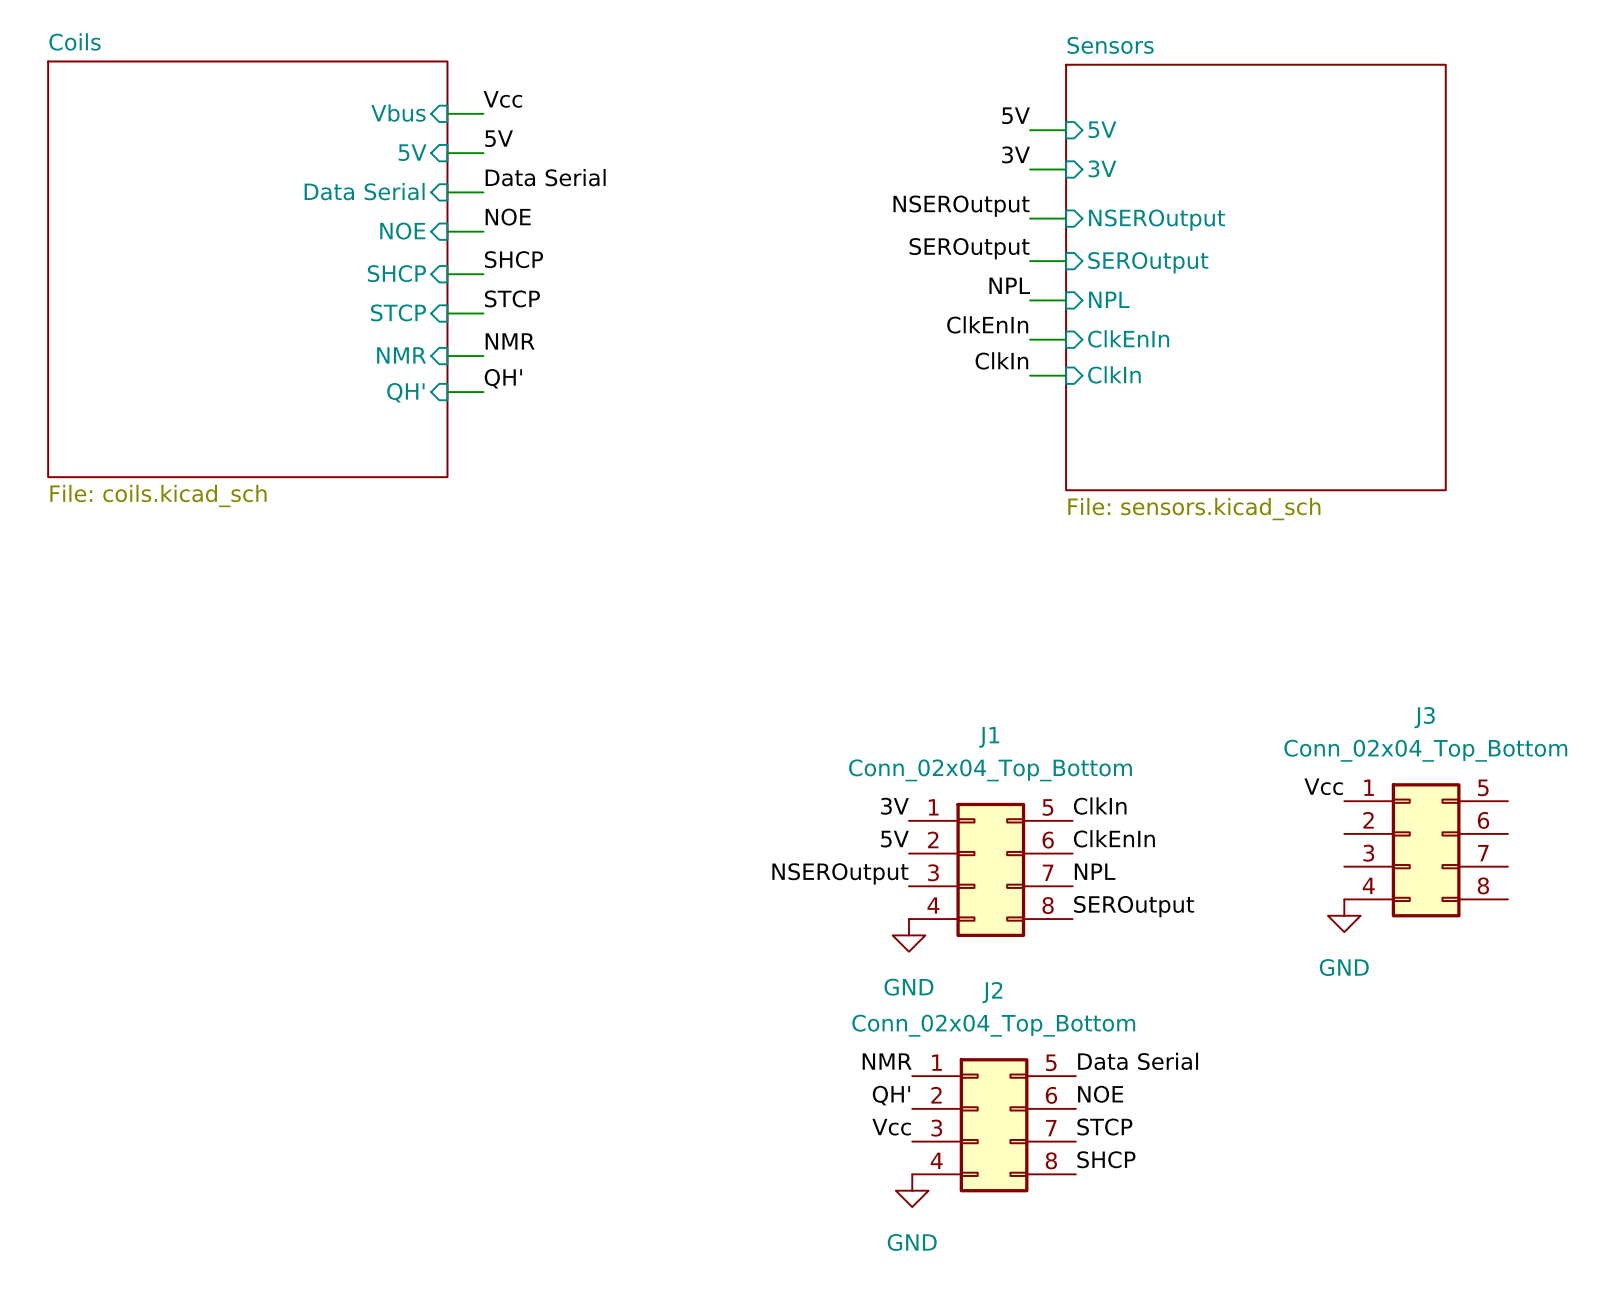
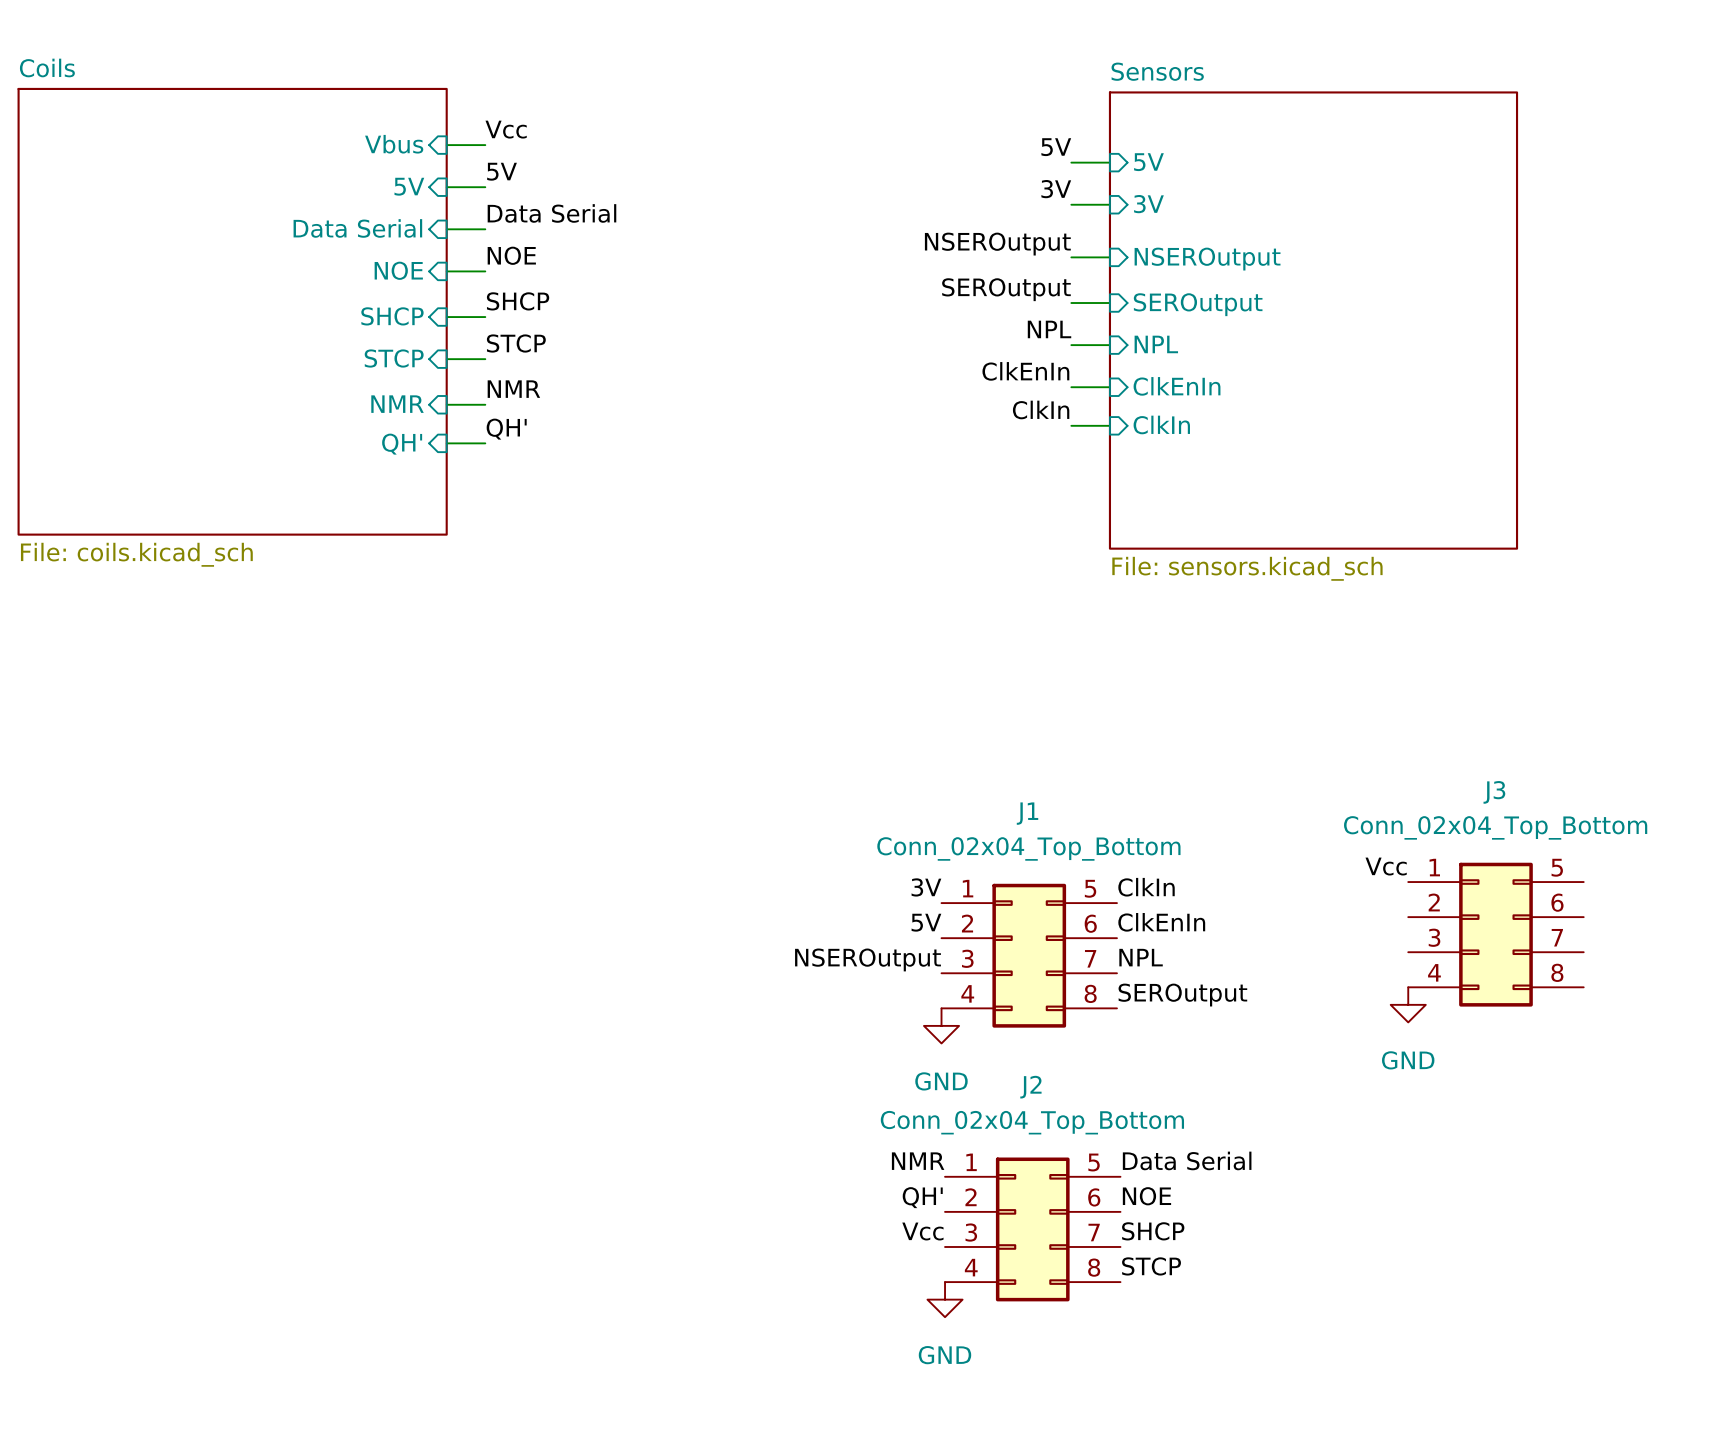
label: STCP (1104, 1127) -> SHCP (1153, 1231)
label: SHCP (1106, 1159) -> STCP (1151, 1266)

